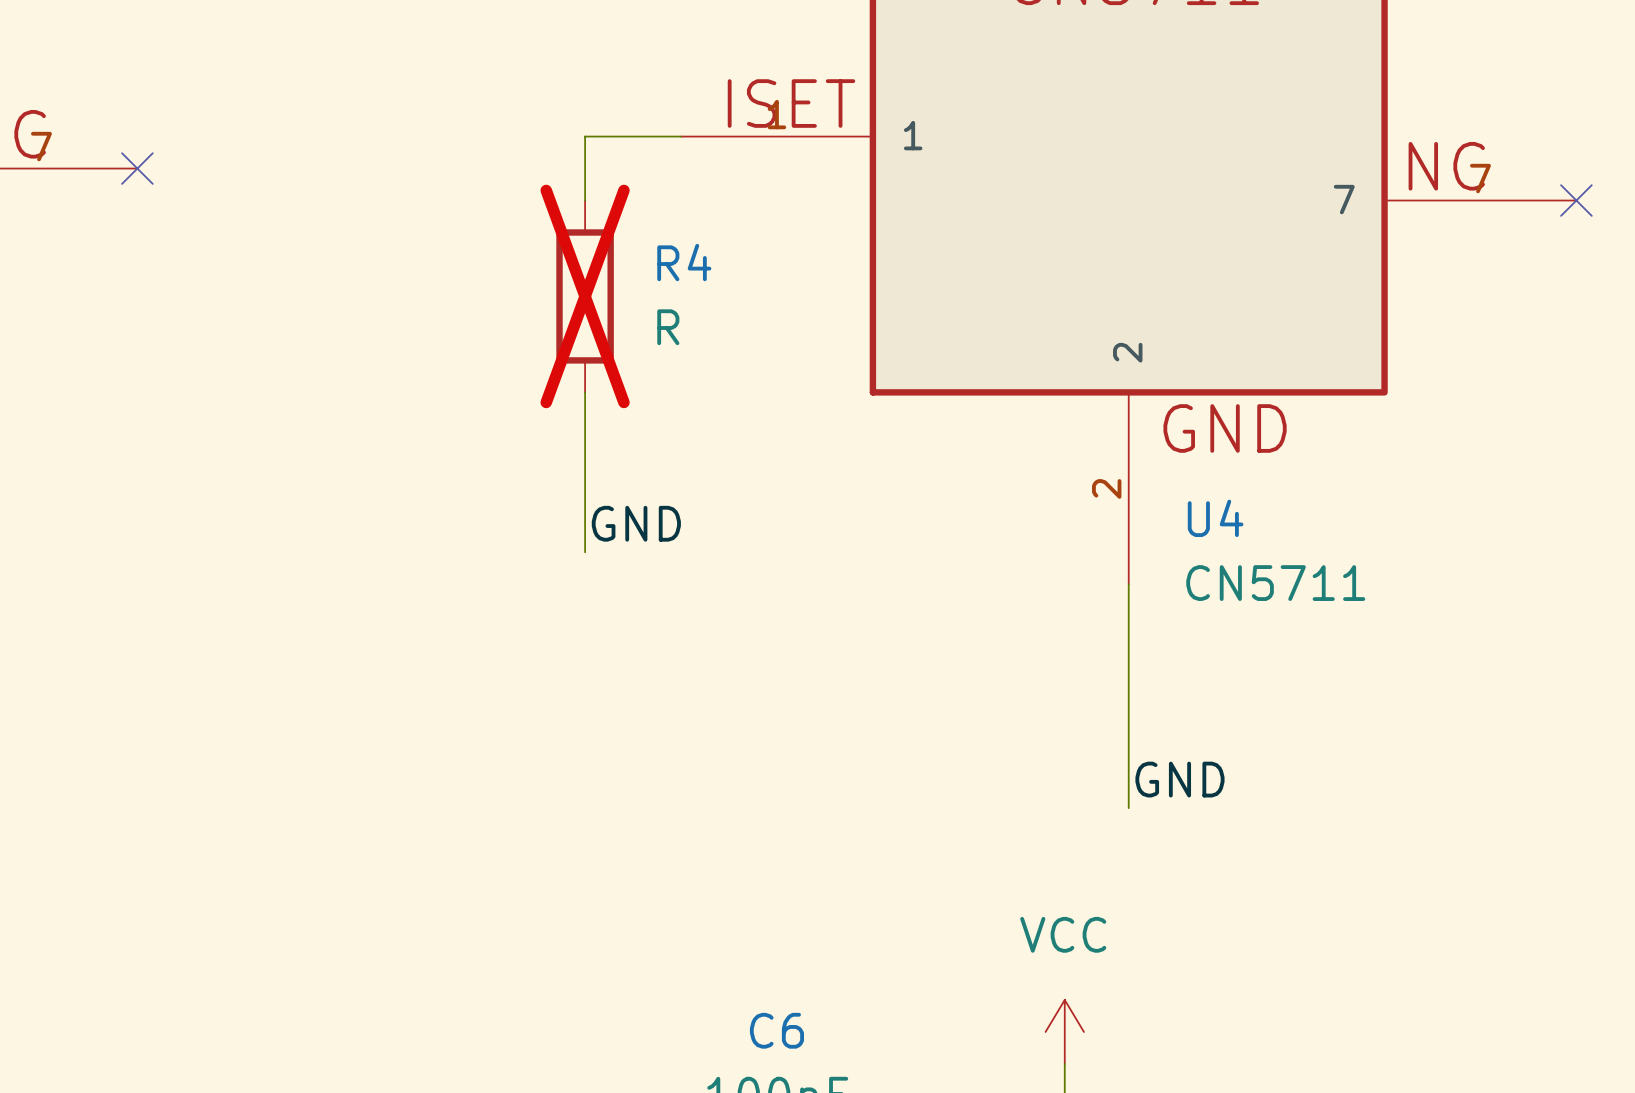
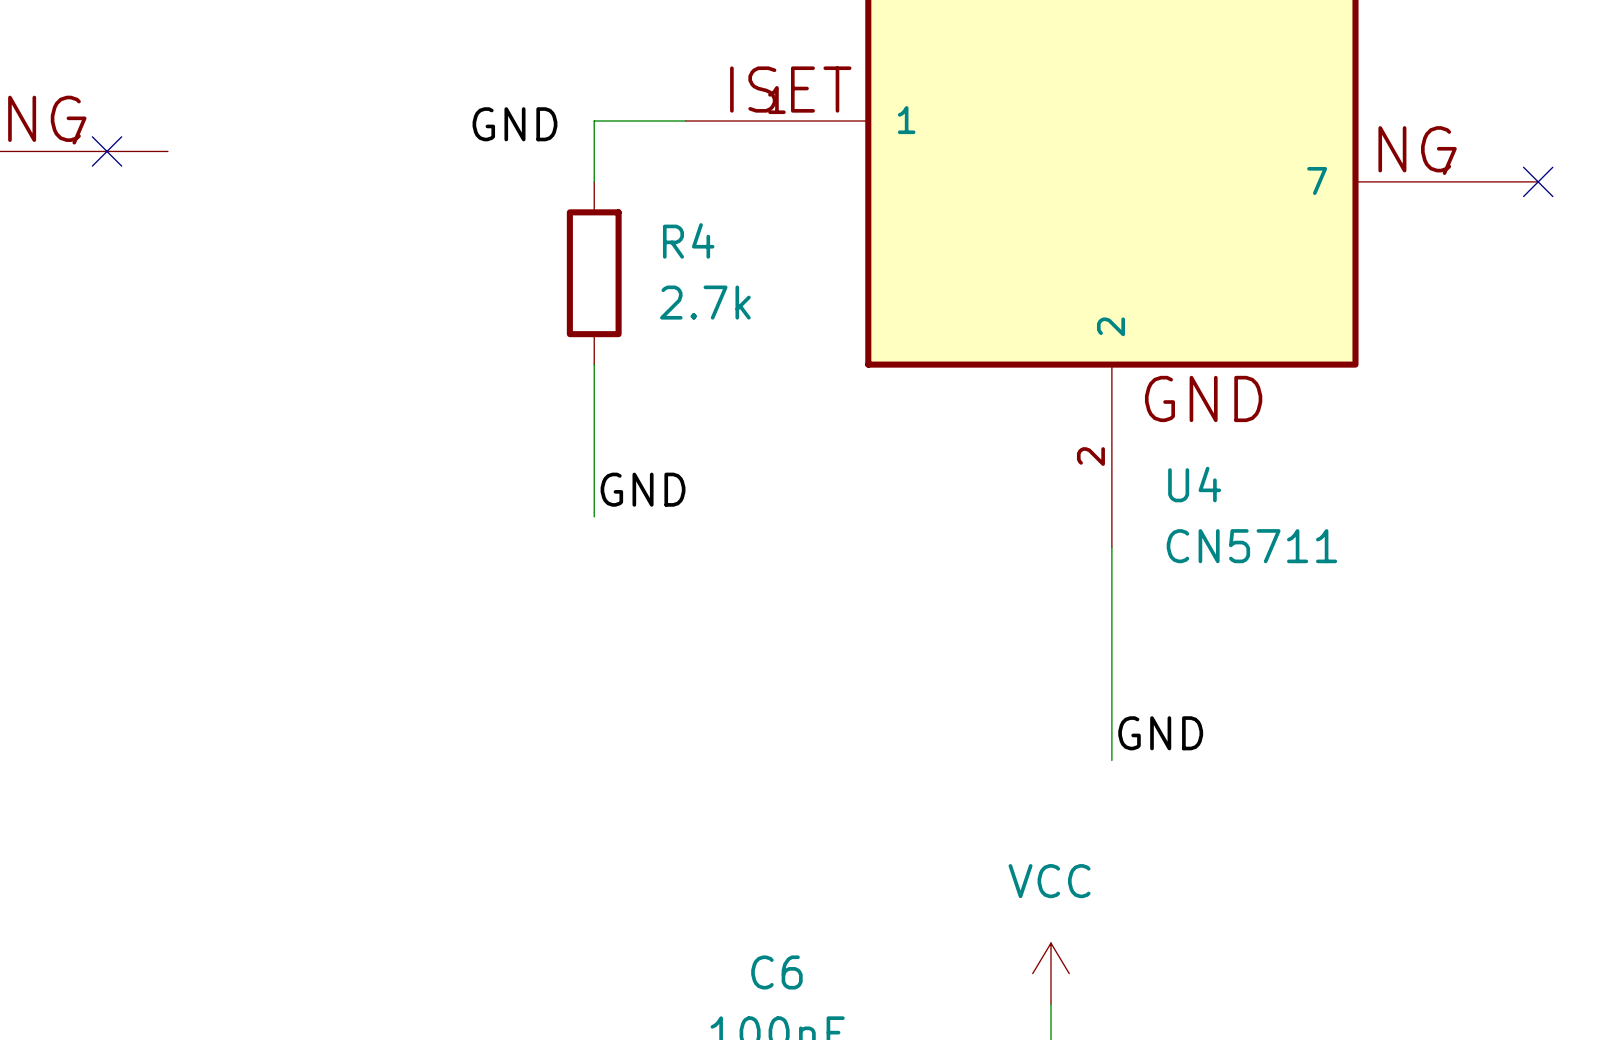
label: none -> GND (514, 124)
no-connect mark position: (137, 168) -> (107, 151)
R4 do-not-place cross: (585, 296) -> none
R4 value: R (668, 327) -> 2.7k (705, 302)

